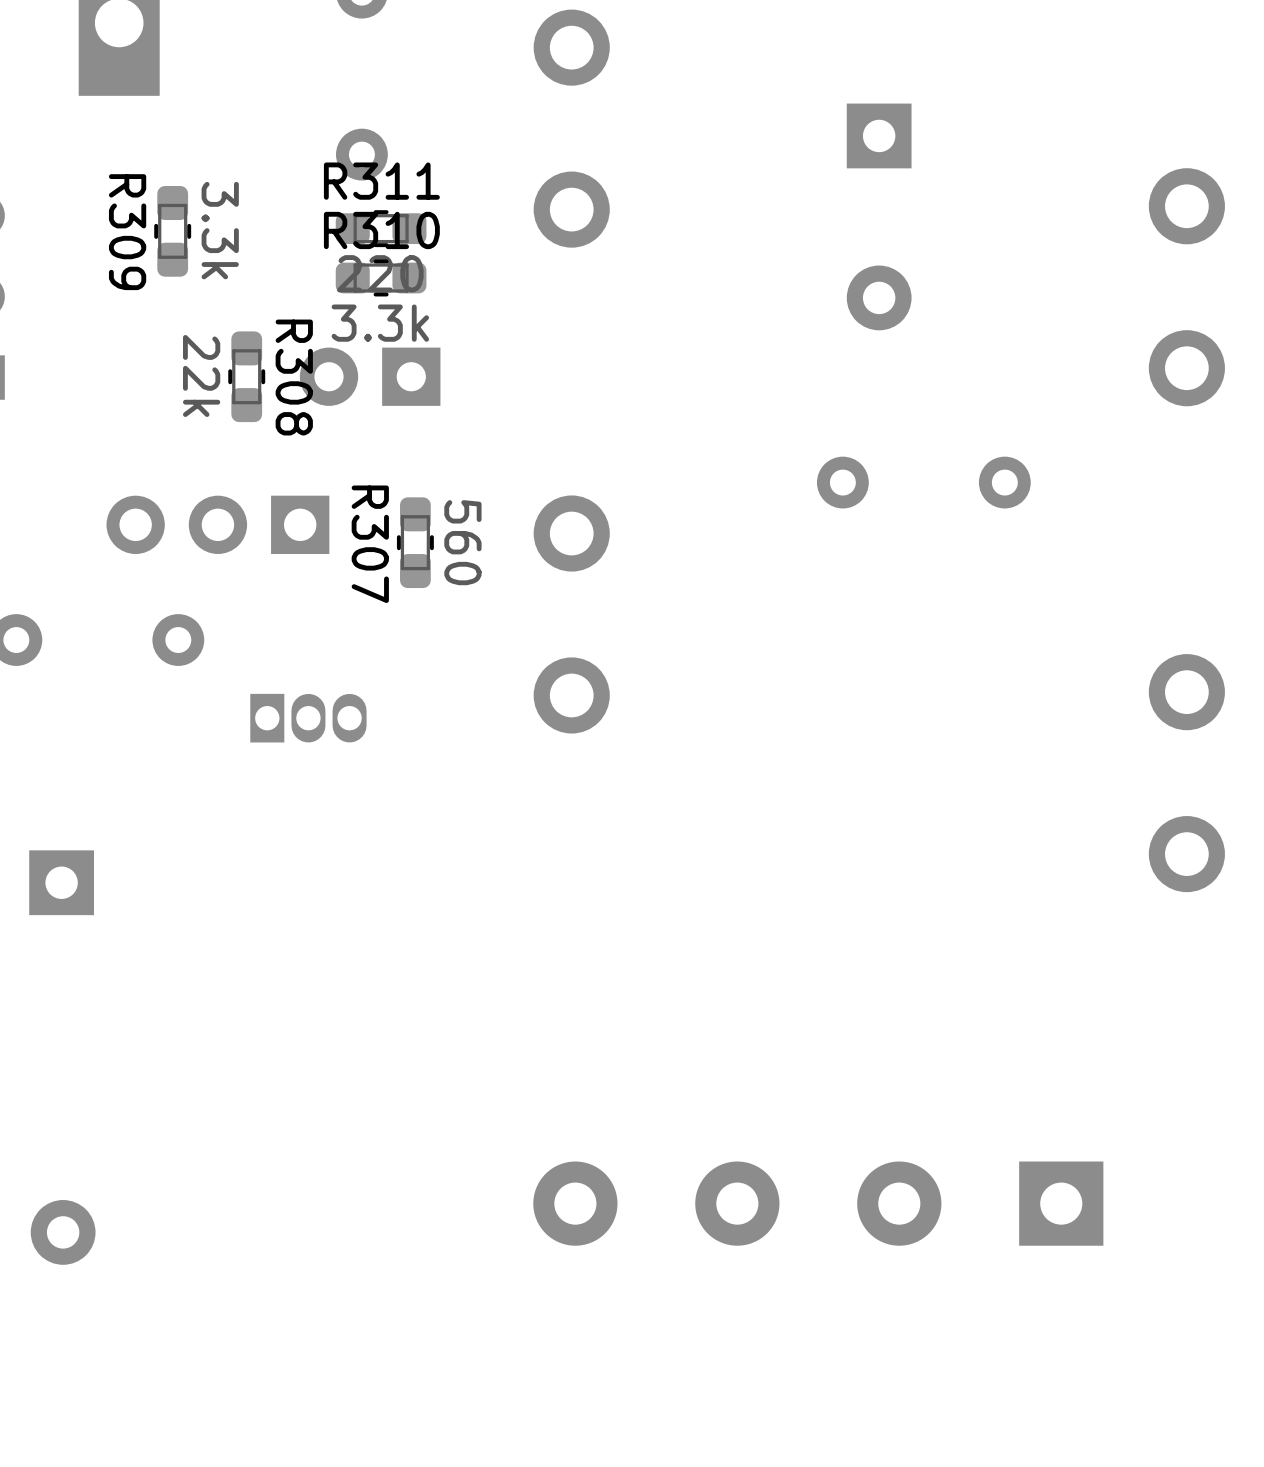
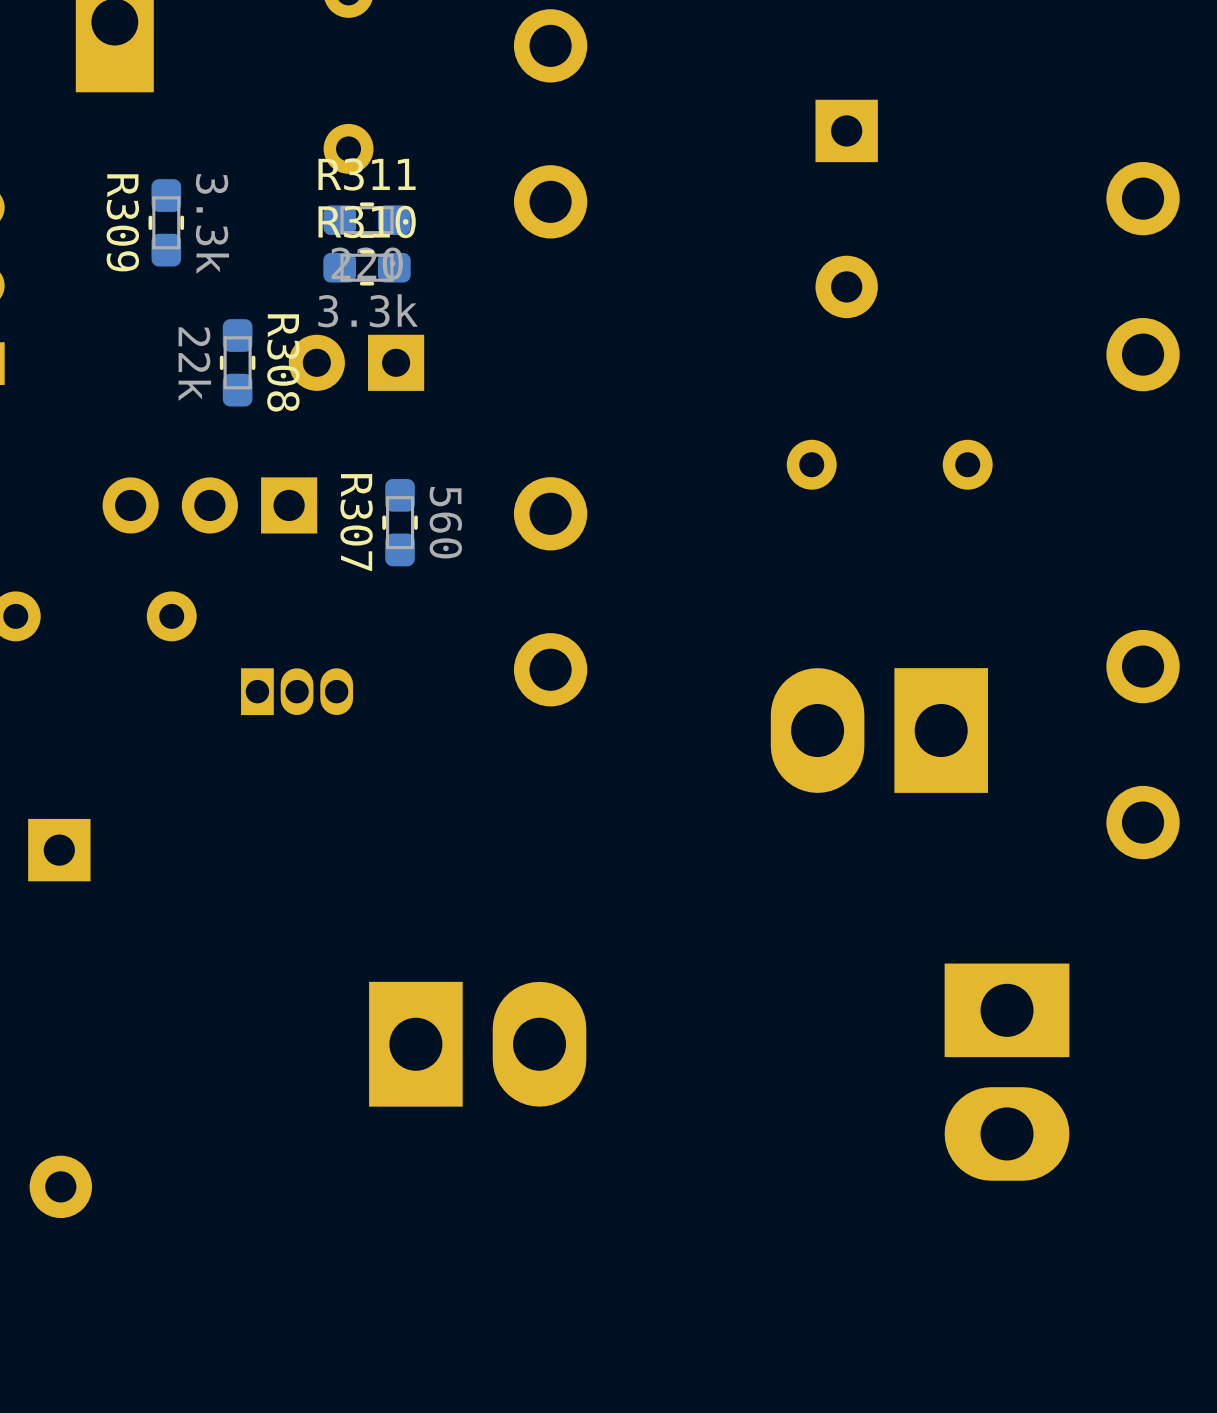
part: none -> (879, 730)
part: none -> (477, 1044)
part: none -> (1007, 1072)
part: (818, 1203) -> none

